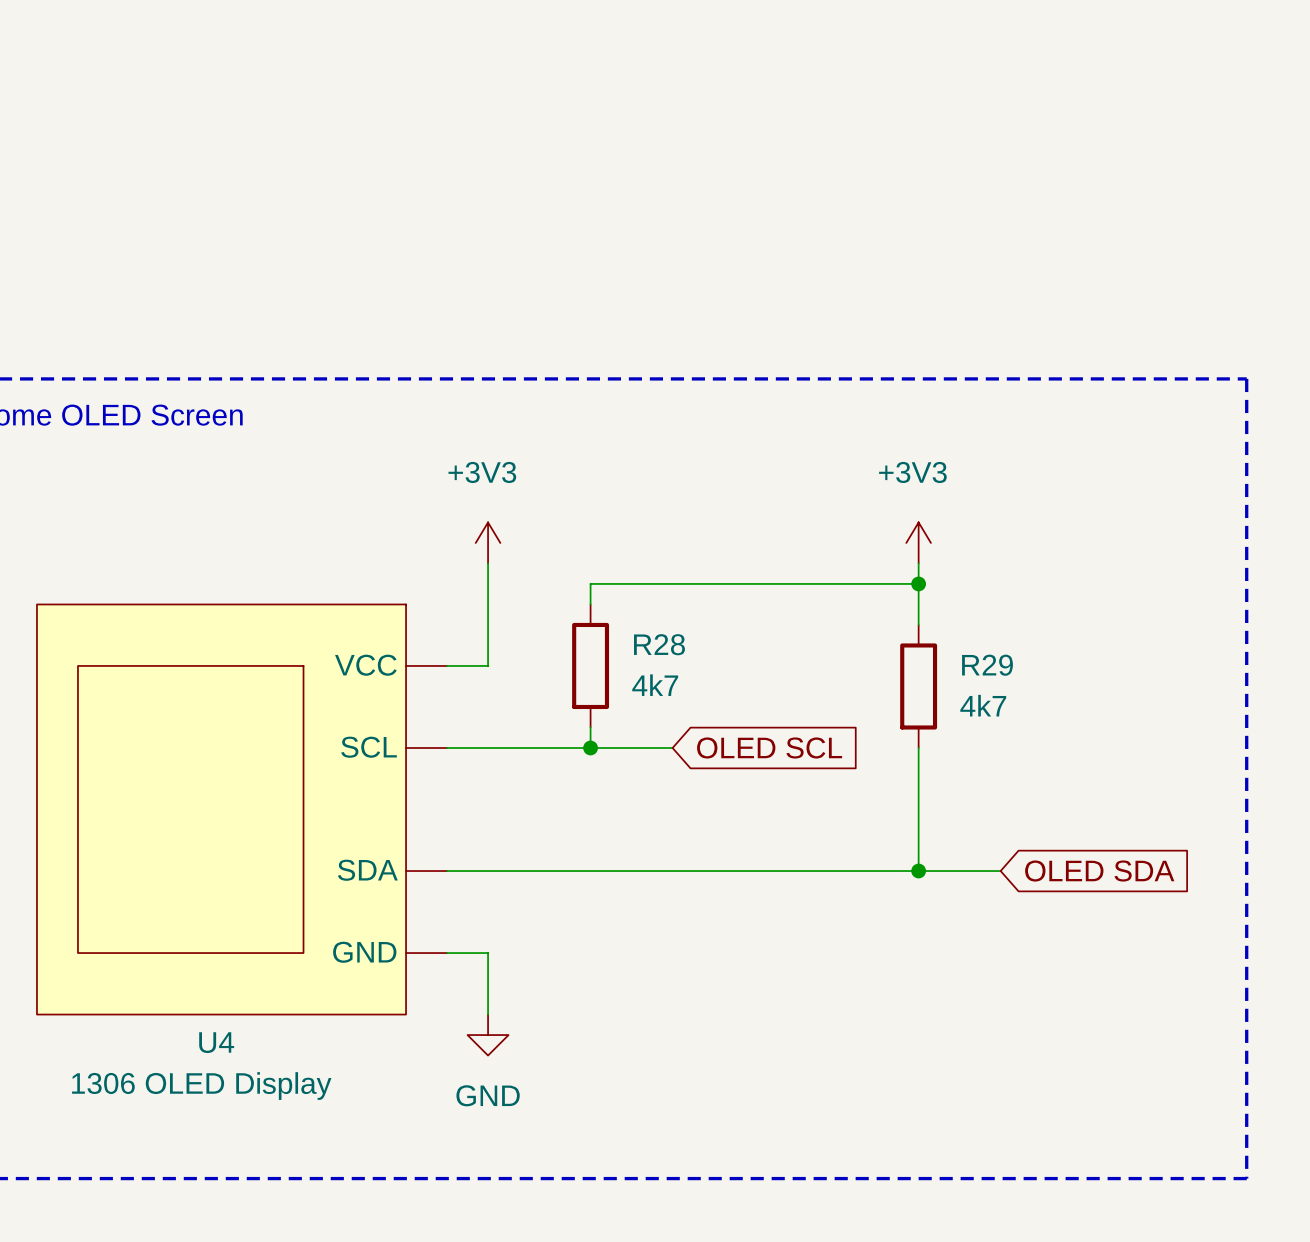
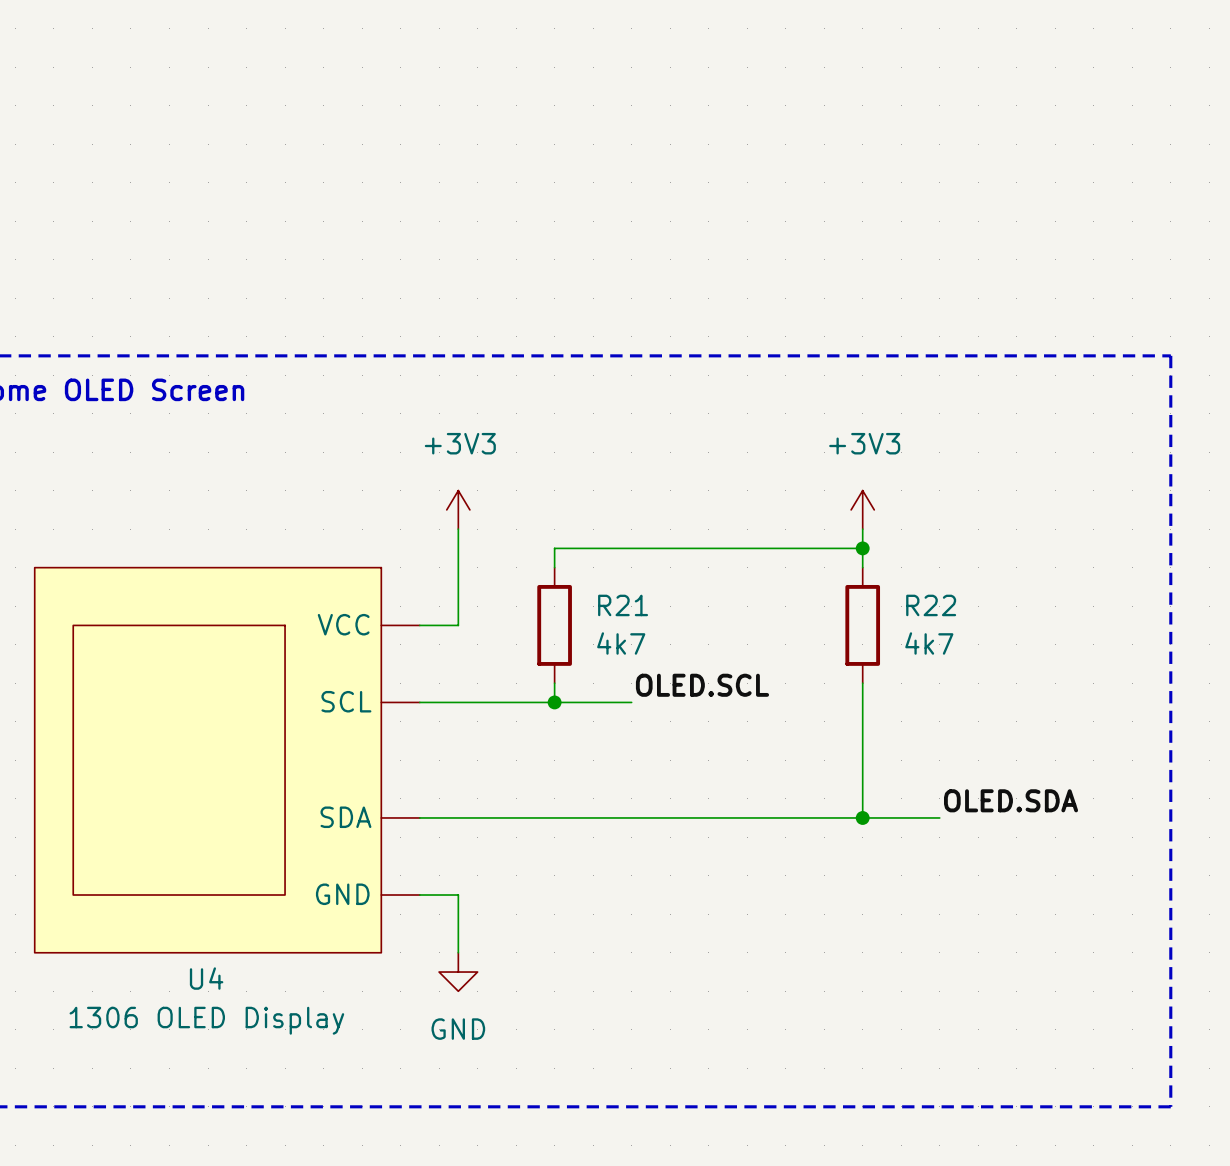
R28 name: R28 (659, 644) -> R21 (623, 605)
R22: none -> 4k7 (862, 625)
R29: 4k7 (918, 686) -> none
label: none -> OLED.SCL (702, 685)
global label: OLED SCL (769, 747) -> none
label: none -> OLED.SDA (1011, 800)
global label: OLED SDA (1099, 871) -> none

